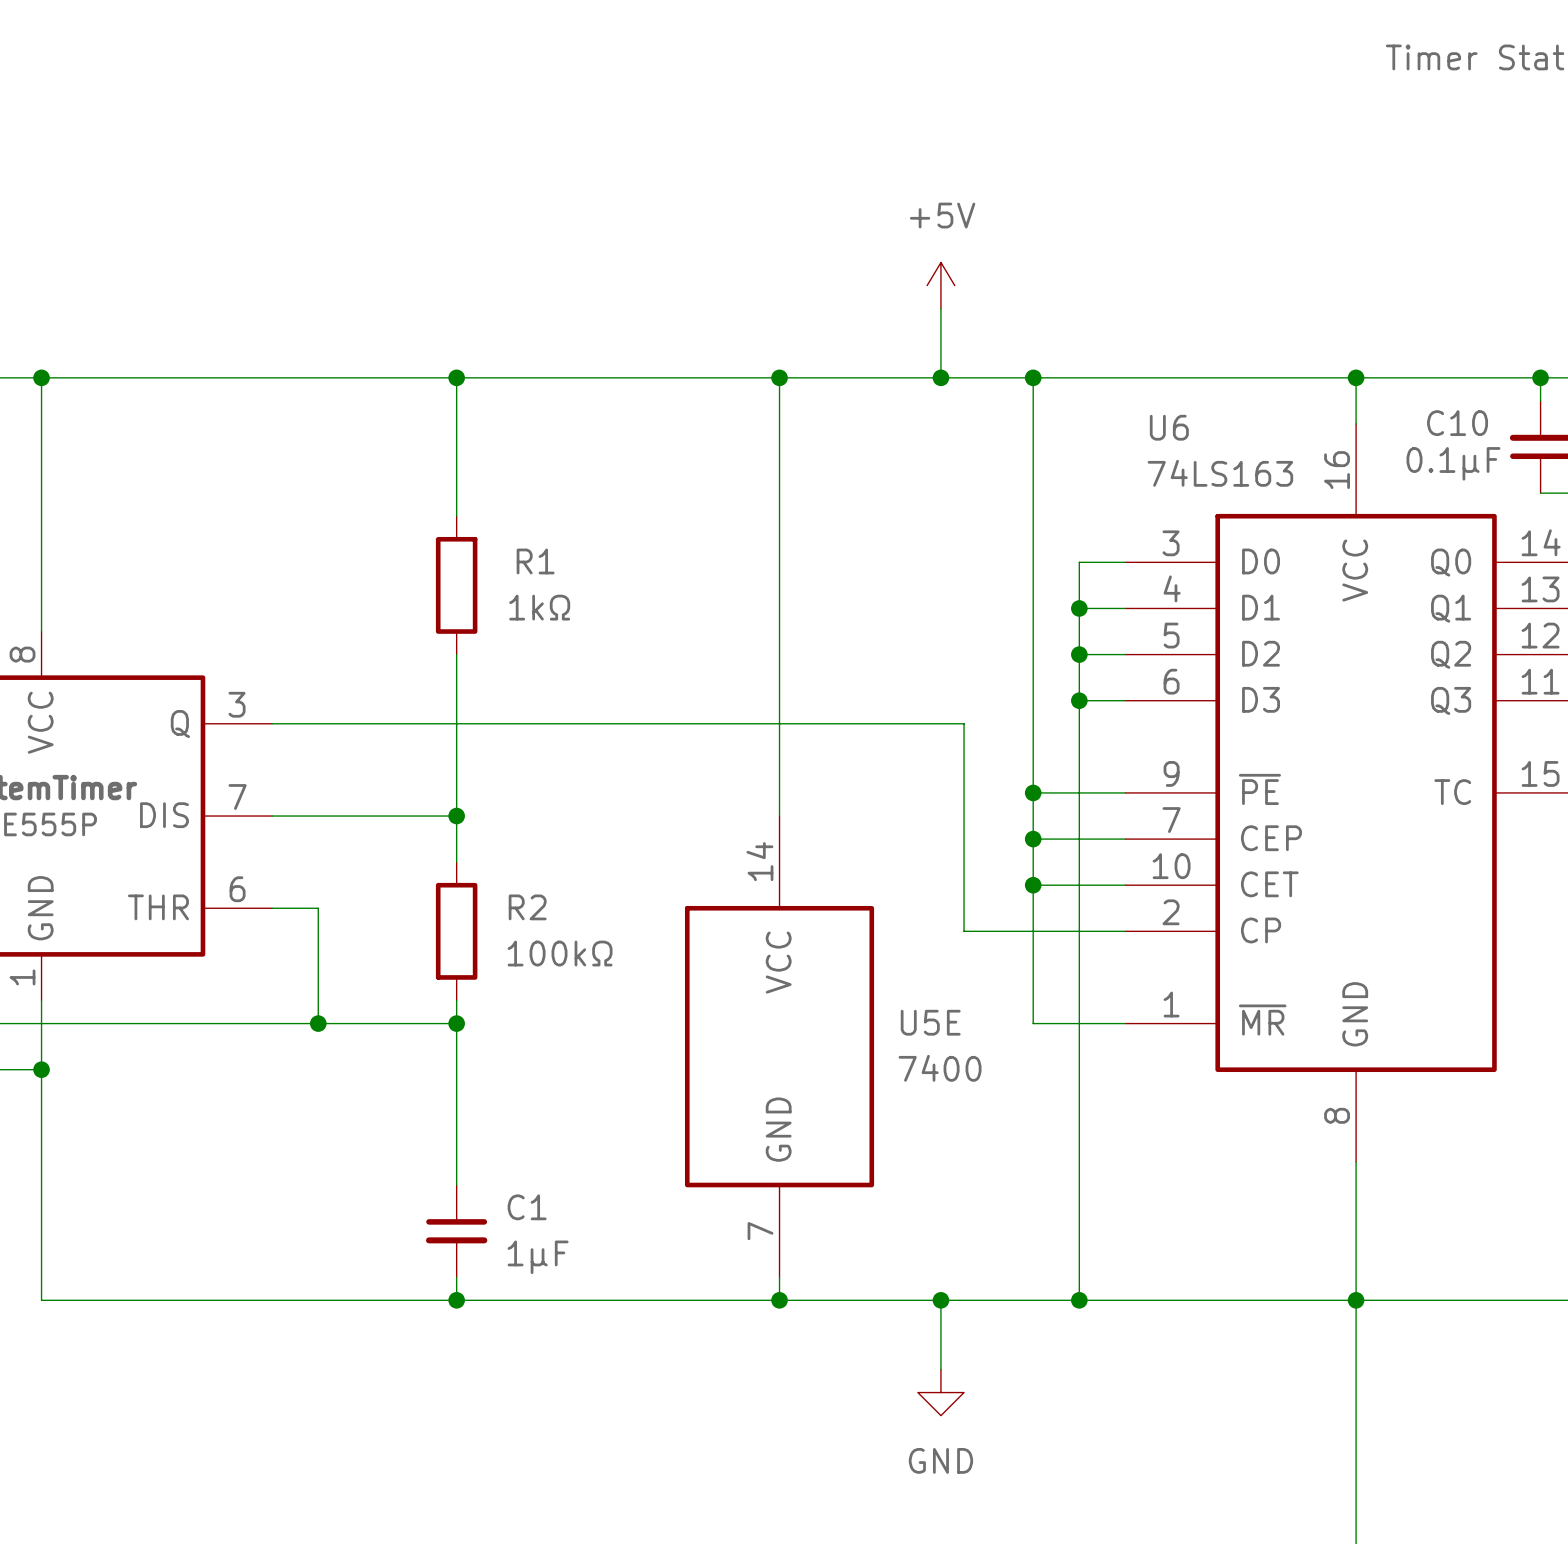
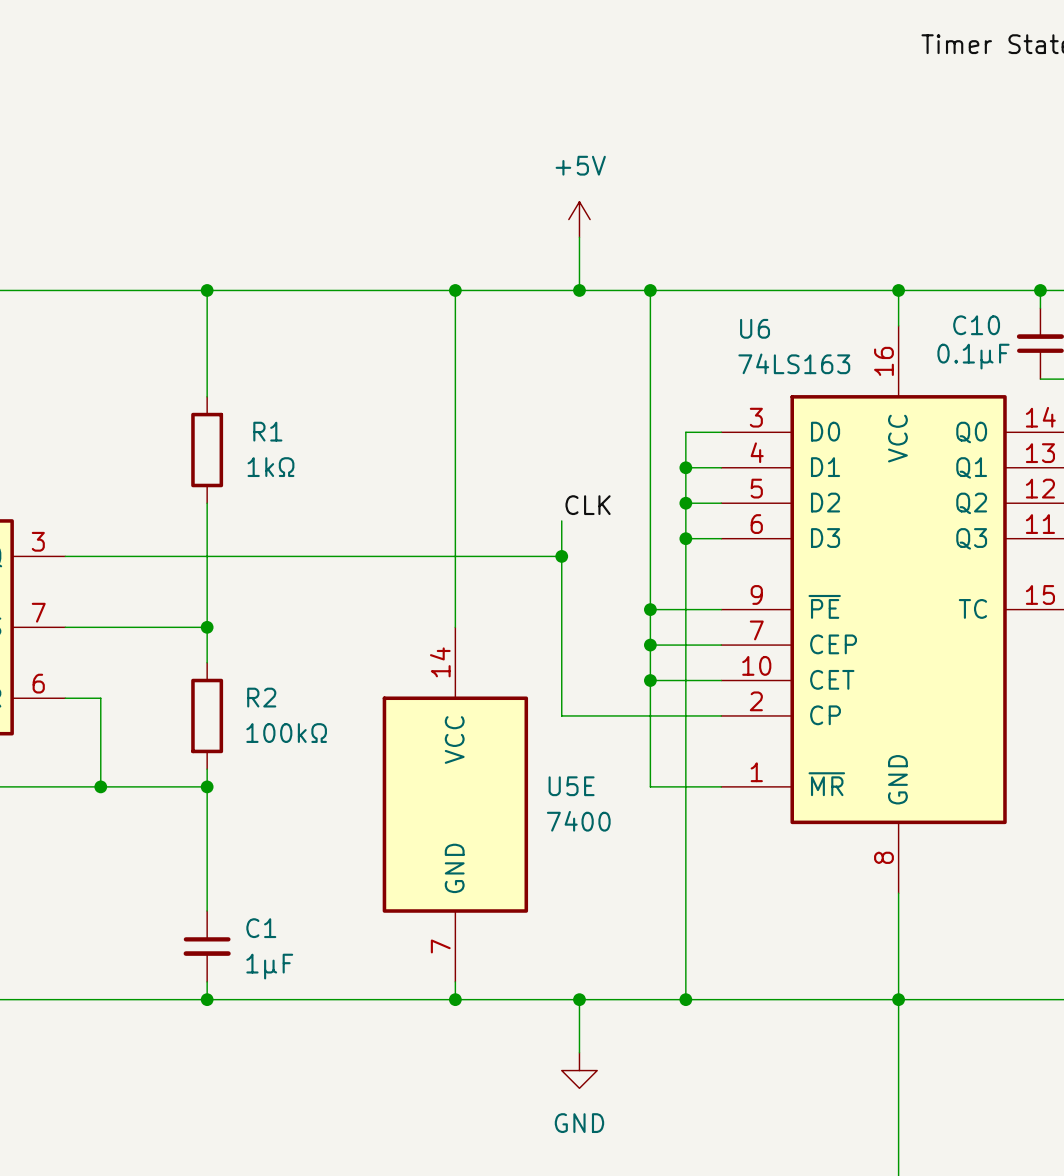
label: none -> CLK (588, 505)
wire: (917, 723) (964, 723) (964, 931) -> (561, 520) (561, 715) (597, 715)
junction: none -> (561, 556)

